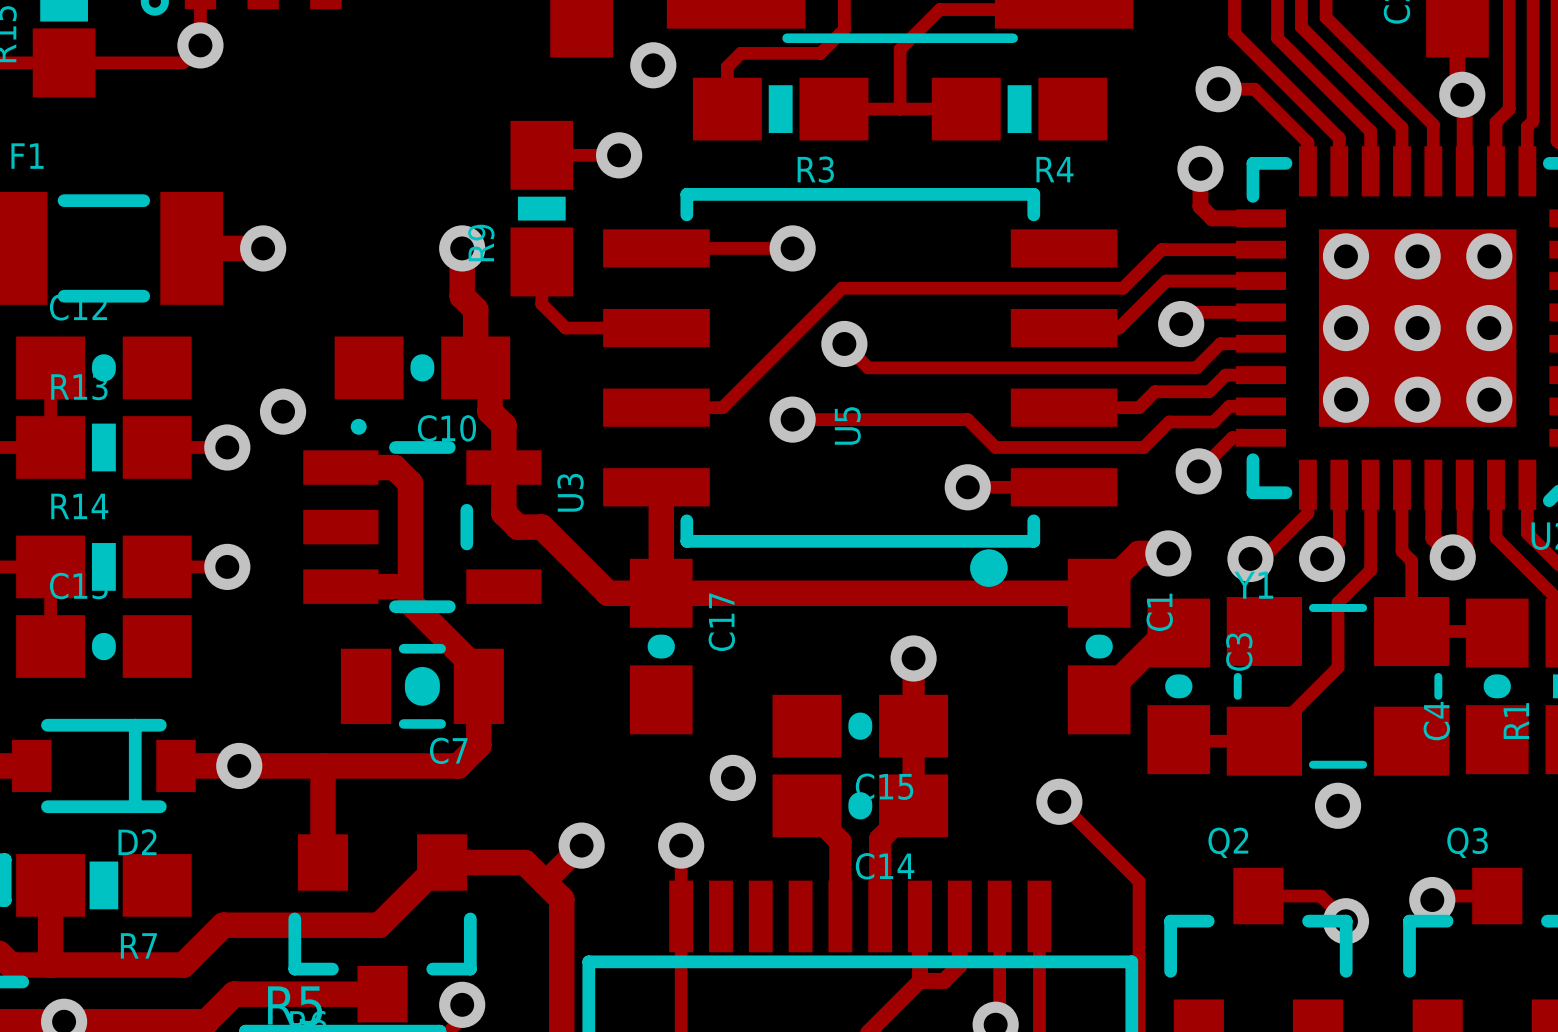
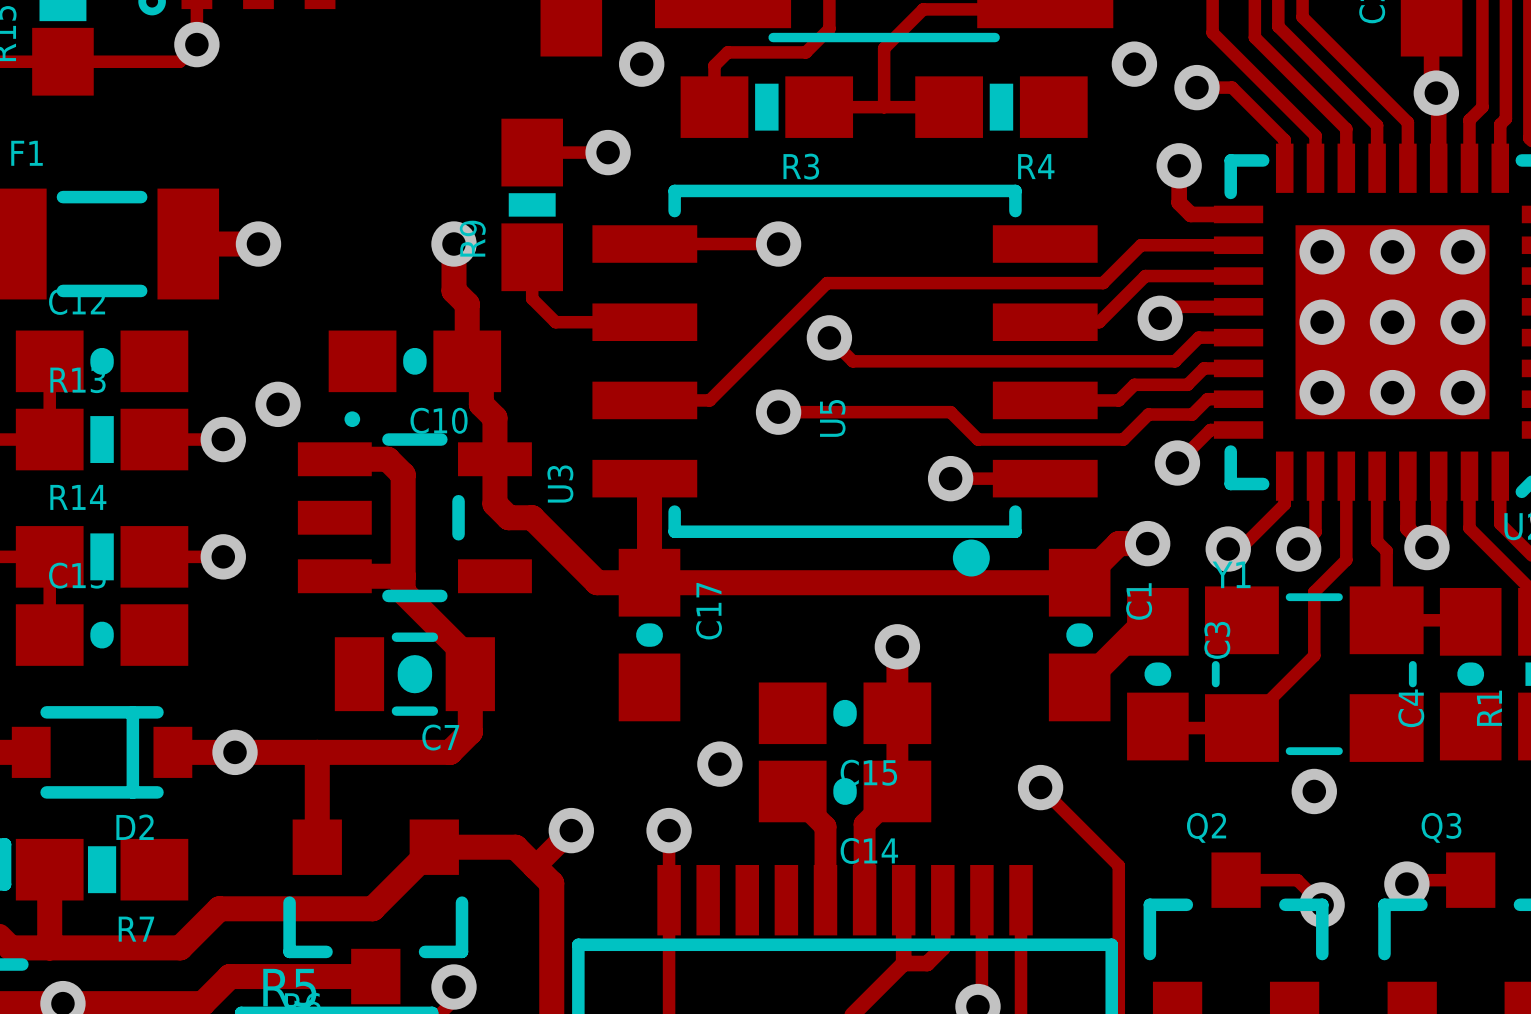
via: none -> (1134, 64)

